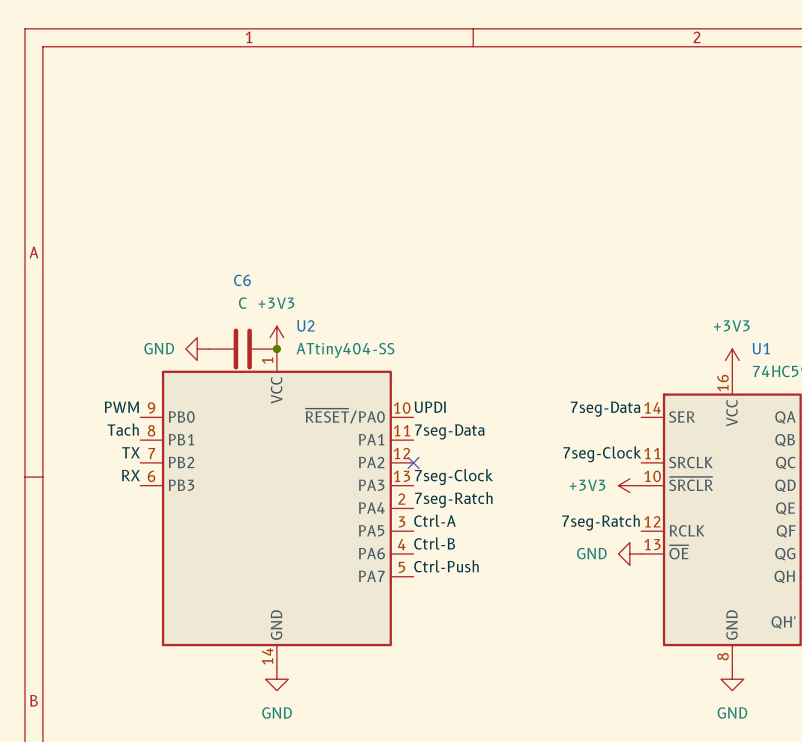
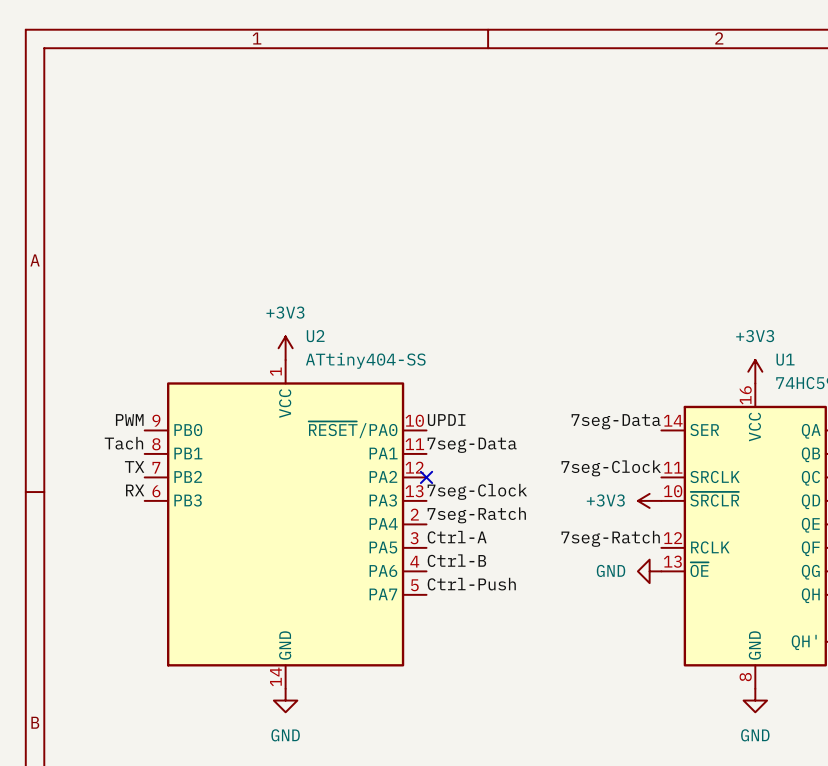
power symbol: GND (197, 349) -> none
C6: C (242, 349) -> none
junction: (276, 349) -> none

